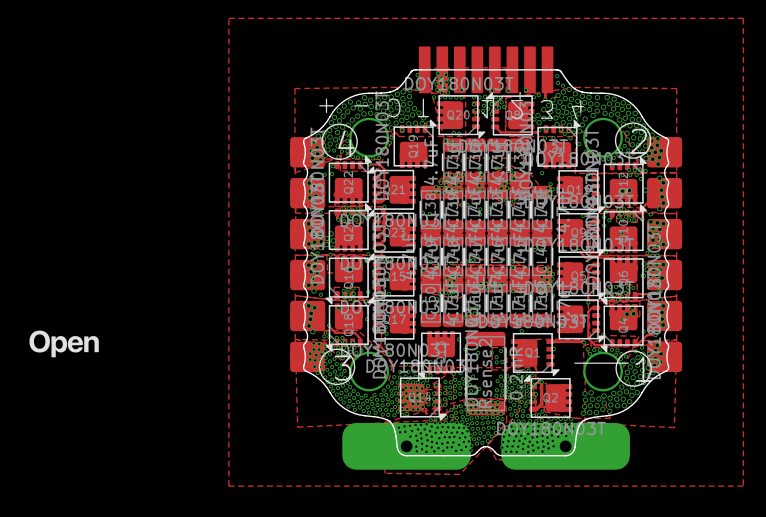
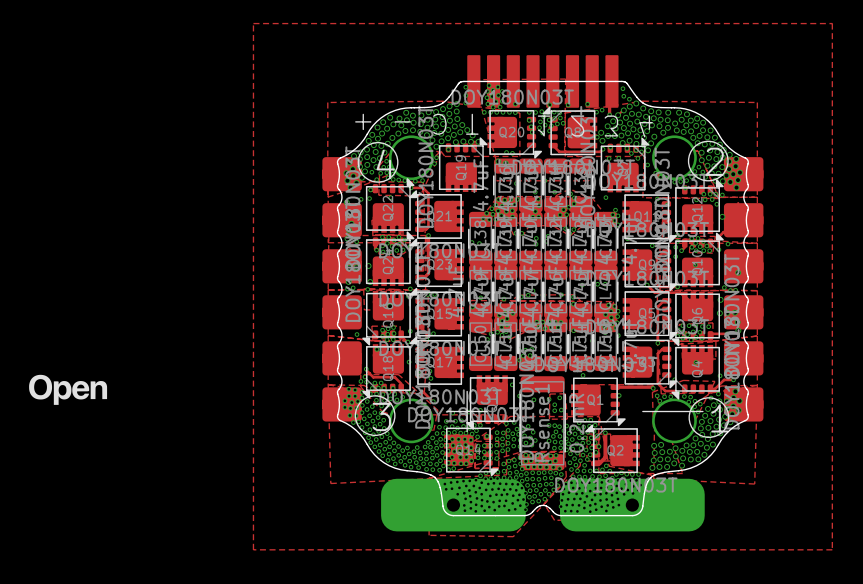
via: (659, 178) -> none
via: (663, 182) -> none
via: (309, 183) -> none
via: (622, 190) -> none
via: (629, 190) -> none
via: (661, 190) -> none
via: (310, 191) -> none
via: (662, 196) -> none
via: (309, 197) -> none
via: (663, 203) -> none
via: (659, 208) -> none
via: (650, 221) -> none
via: (657, 222) -> none
via: (308, 223) -> none
via: (663, 223) -> none
via: (653, 228) -> none
via: (659, 229) -> none
via: (310, 230) -> none
via: (650, 233) -> none
via: (656, 234) -> none
via: (327, 238) -> none
via: (333, 240) -> none
via: (652, 240) -> none
via: (321, 241) -> none
via: (314, 242) -> none
via: (308, 244) -> none
via: (326, 244) -> none
via: (663, 244) -> none
via: (657, 245) -> none
via: (320, 247) -> none
via: (650, 247) -> none
via: (315, 260) -> none
via: (650, 264) -> none
via: (656, 264) -> none
via: (663, 264) -> none
via: (308, 265) -> none
via: (314, 266) -> none
via: (647, 269) -> none
via: (653, 269) -> none
via: (659, 270) -> none
via: (311, 271) -> none
via: (317, 272) -> none
via: (312, 278) -> none
via: (662, 278) -> none
via: (315, 284) -> none
via: (308, 285) -> none
via: (314, 291) -> none
via: (660, 299) -> none
via: (308, 305) -> none
via: (663, 306) -> none
via: (314, 307) -> none
via: (632, 307) -> none
via: (662, 312) -> none
via: (311, 313) -> none
via: (633, 313) -> none
via: (627, 314) -> none
via: (310, 319) -> none
via: (662, 319) -> none
via: (663, 324) -> none
via: (308, 325) -> none
via: (312, 331) -> none
Rsense2 name: Rsense2 (485, 373) -> Rsense1 (542, 422)
via: none -> (549, 425)
via: none -> (554, 425)
via: none -> (533, 432)
via: none -> (553, 436)
via: none -> (549, 440)

